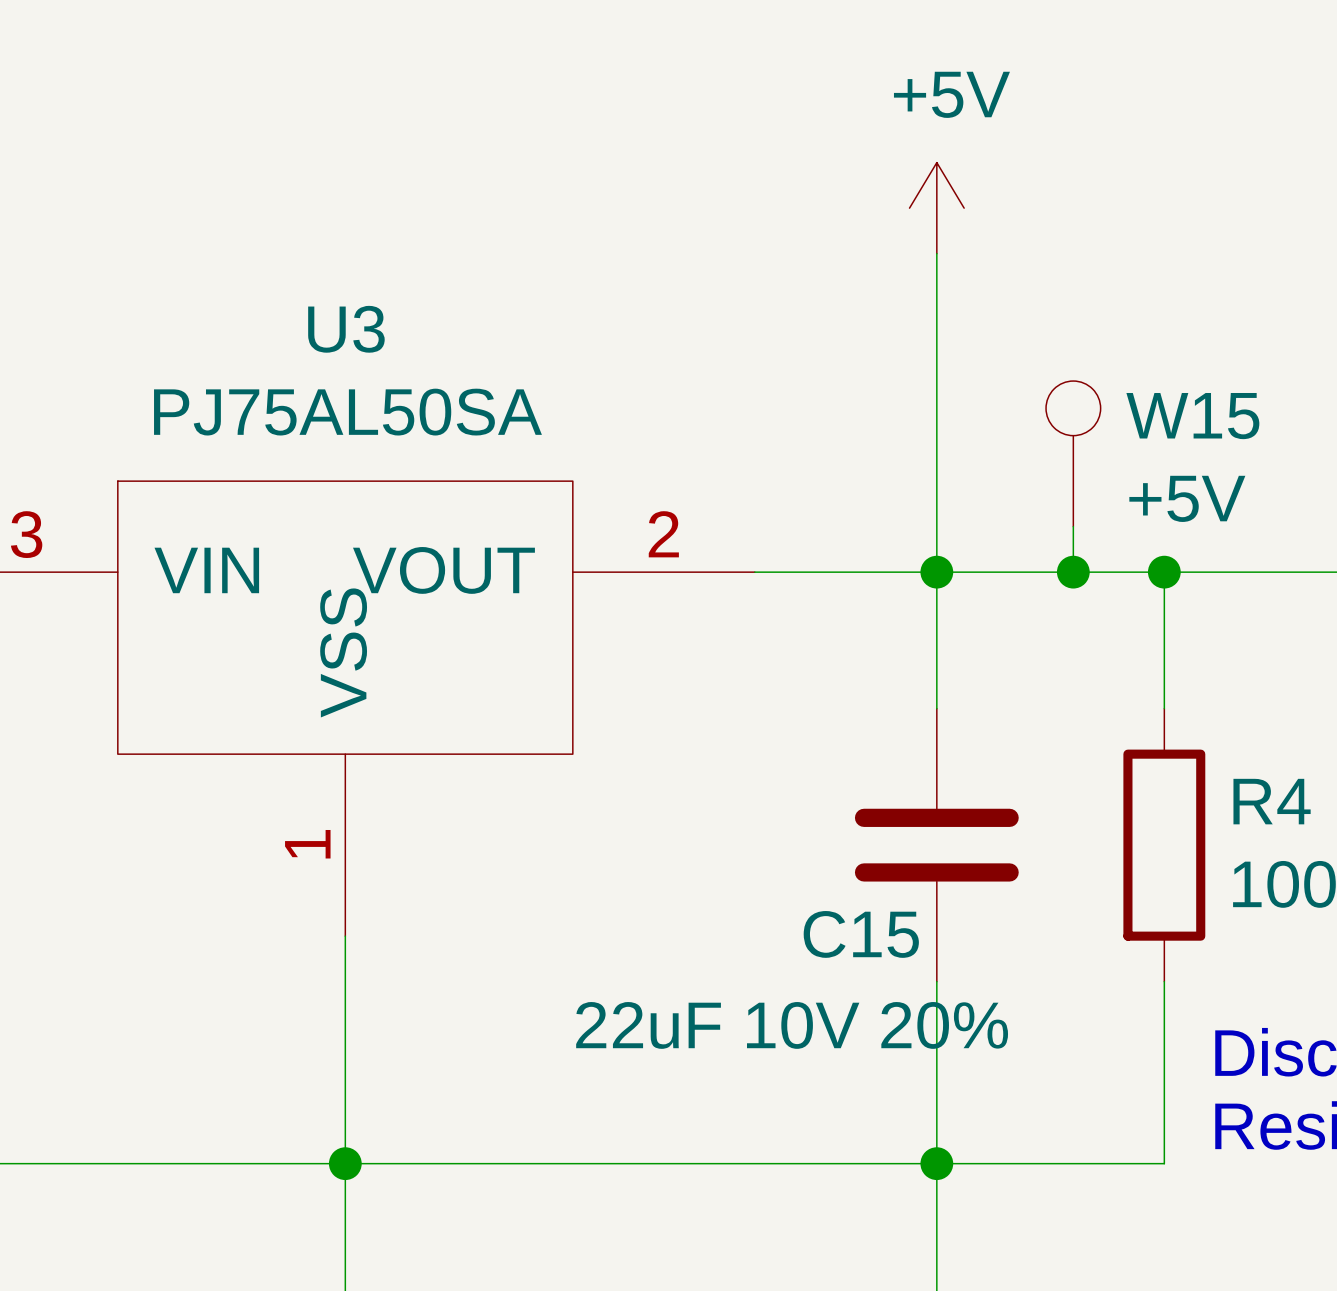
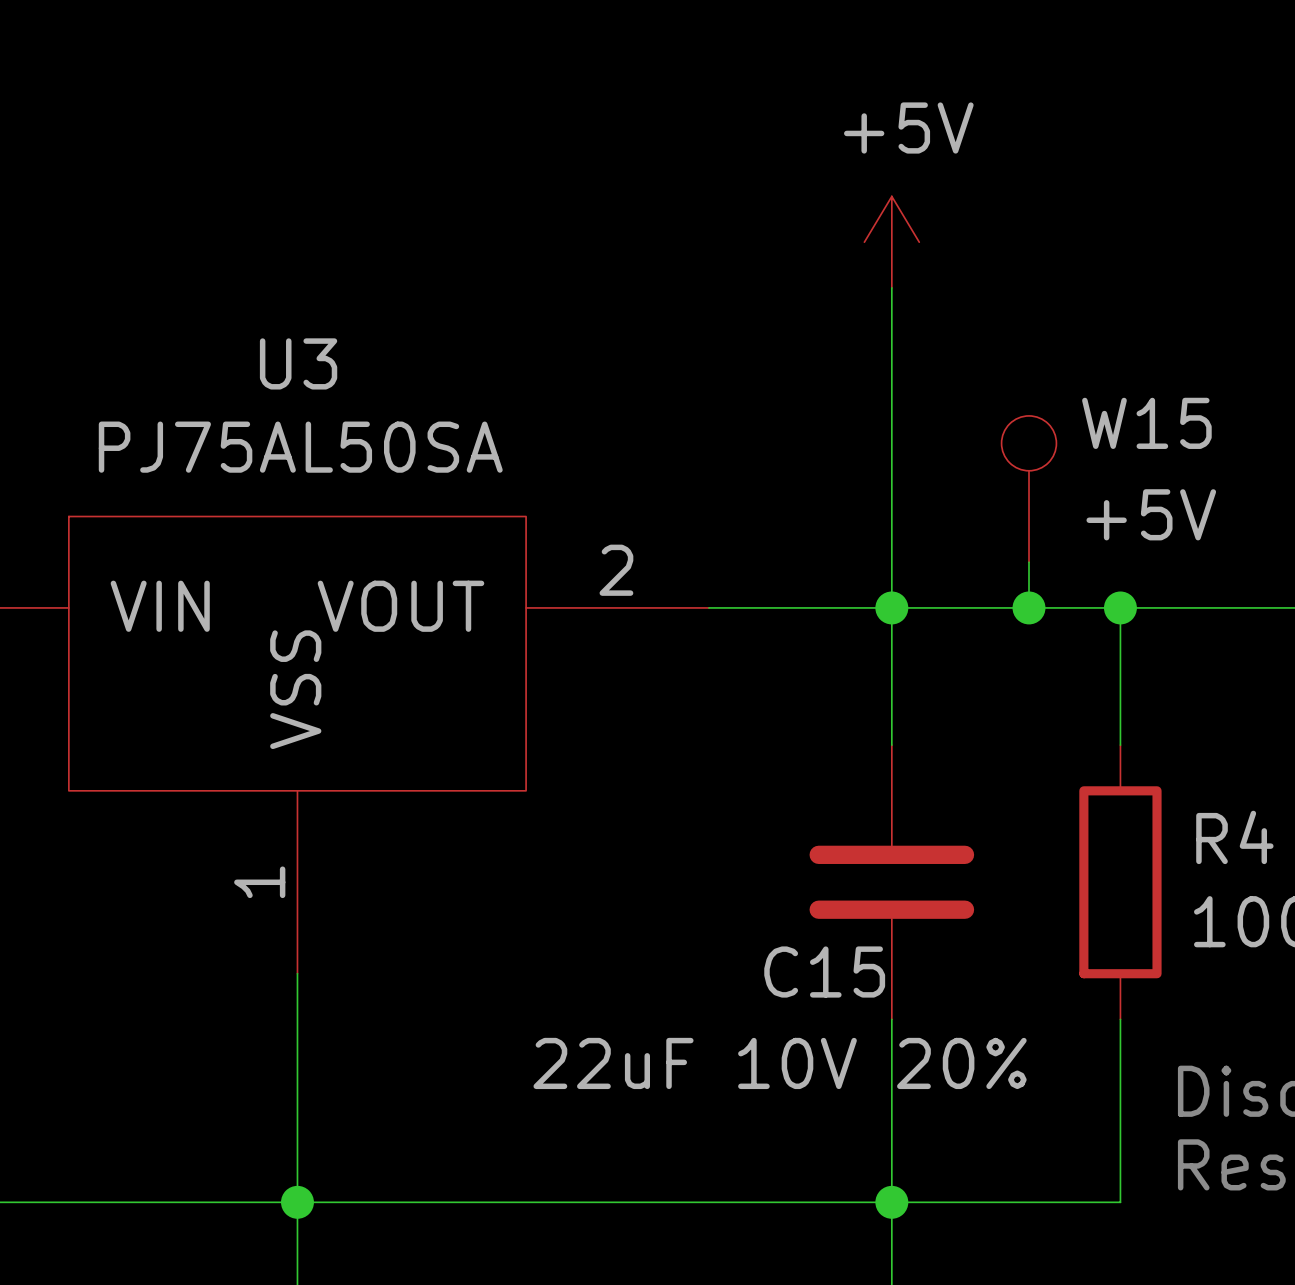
W15 name position: W15 (1192, 416) -> W15 (1146, 423)
W15 value position: +5V (1187, 498) -> +5V (1151, 514)

